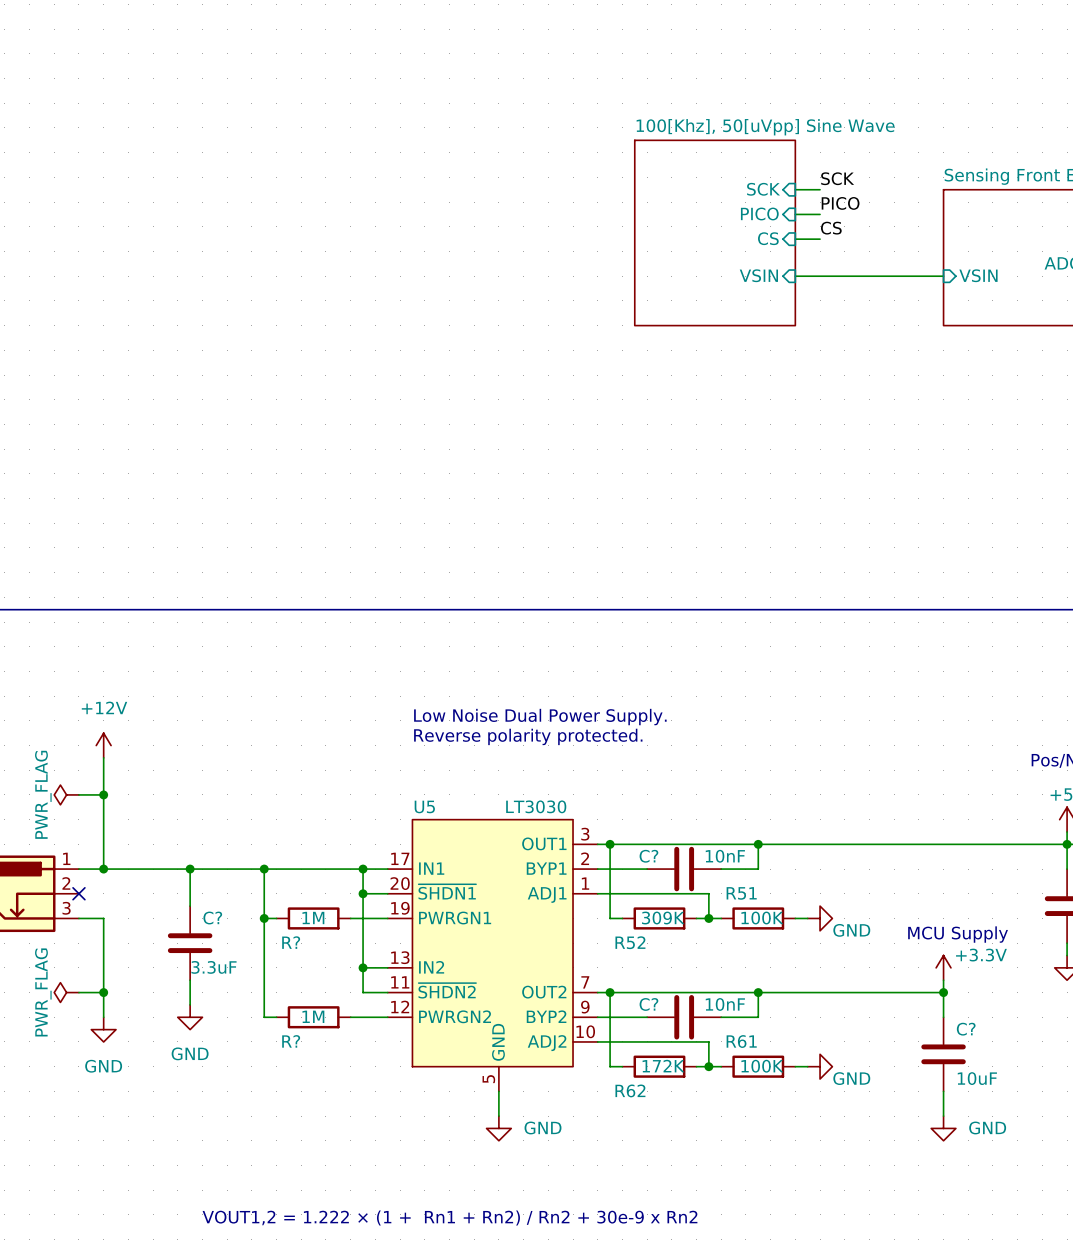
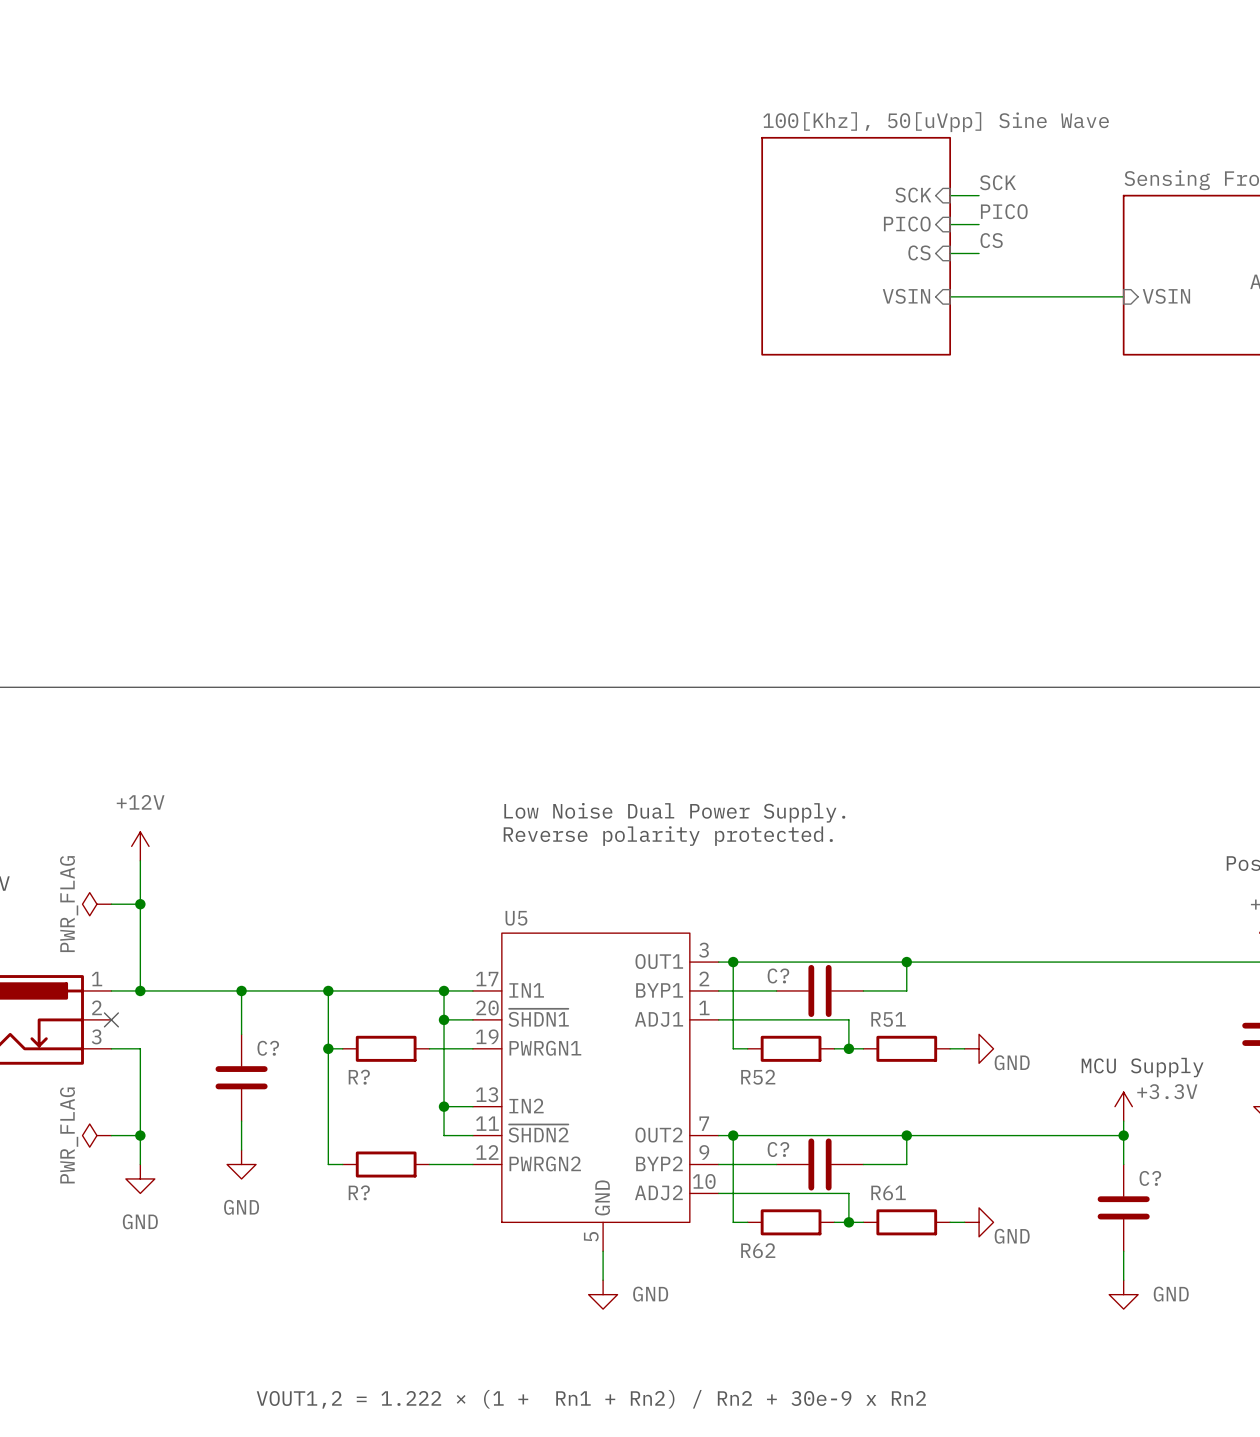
U5 value: LT3030 (536, 806) -> none
C? value: 10nF (725, 856) -> none
R? value: 1M (313, 918) -> none
R52 value: 309K (663, 918) -> none
R51 value: 100K (762, 918) -> none
C? value: 3.3uF (213, 967) -> none
C? value: 10nF (725, 1004) -> none
R? value: 1M (313, 1016) -> none
R62 value: 172K (663, 1066) -> none
R61 value: 100K (762, 1066) -> none
C? value: 10uF (977, 1078) -> none

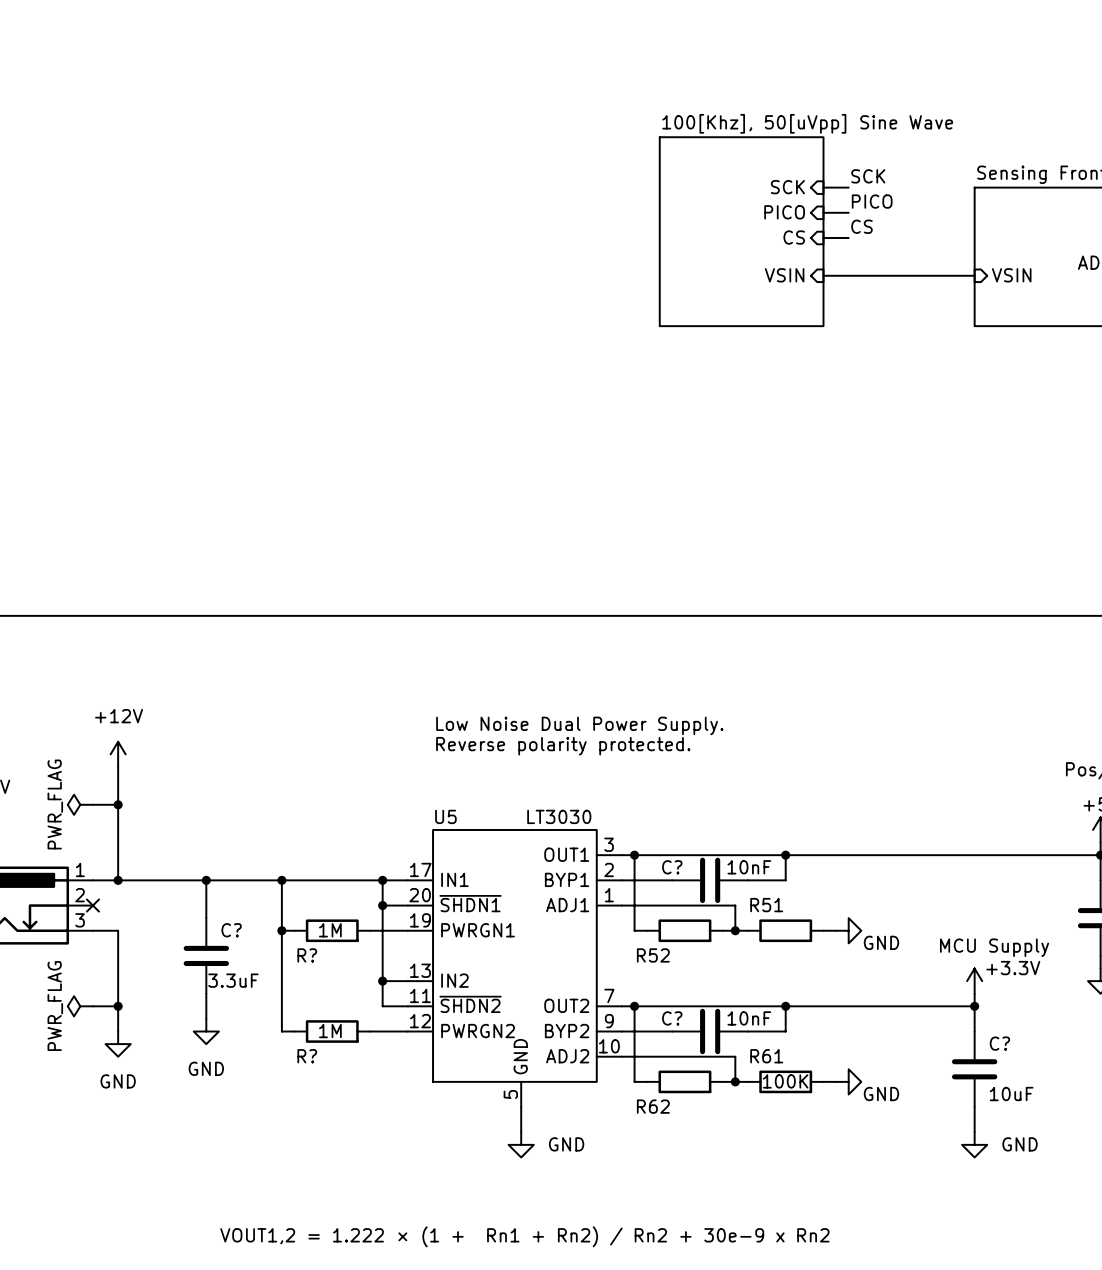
U5 value: none -> LT3030 (559, 816)
C? value: none -> 10nF (749, 867)
R? value: none -> 1M (330, 930)
C? value: none -> 3.3uF (233, 980)
C? value: none -> 10nF (749, 1018)
R? value: none -> 1M (330, 1031)
R61 value: none -> 100K (785, 1081)
C? value: none -> 10uF (1011, 1094)

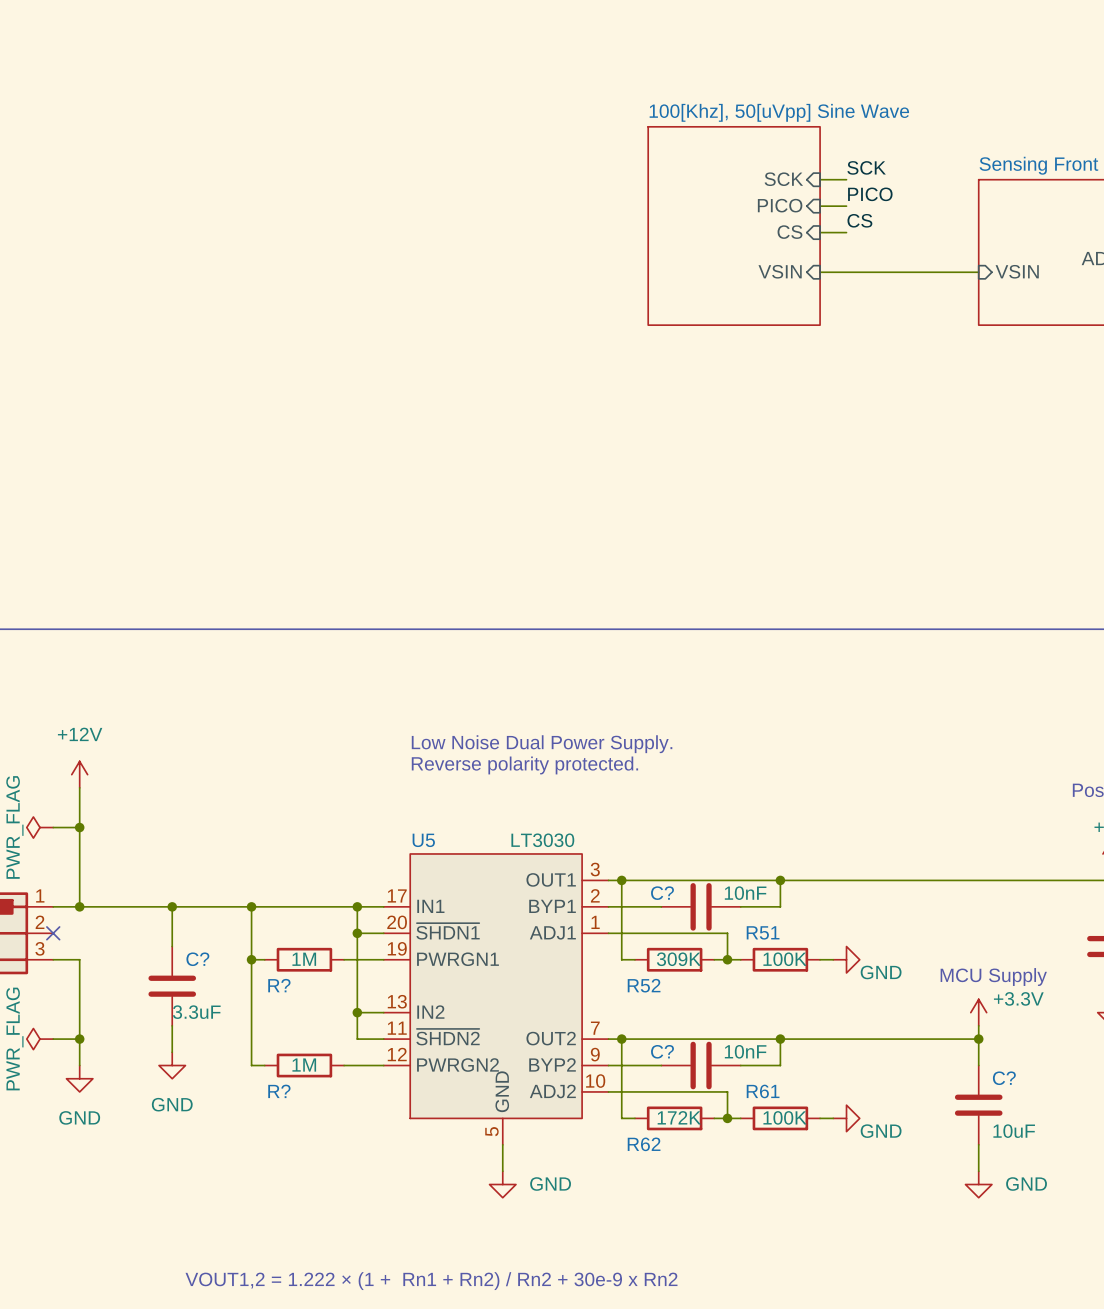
R52 value: none -> 309K (678, 959)
R51 value: none -> 100K (785, 959)
R62 value: none -> 172K (679, 1117)

